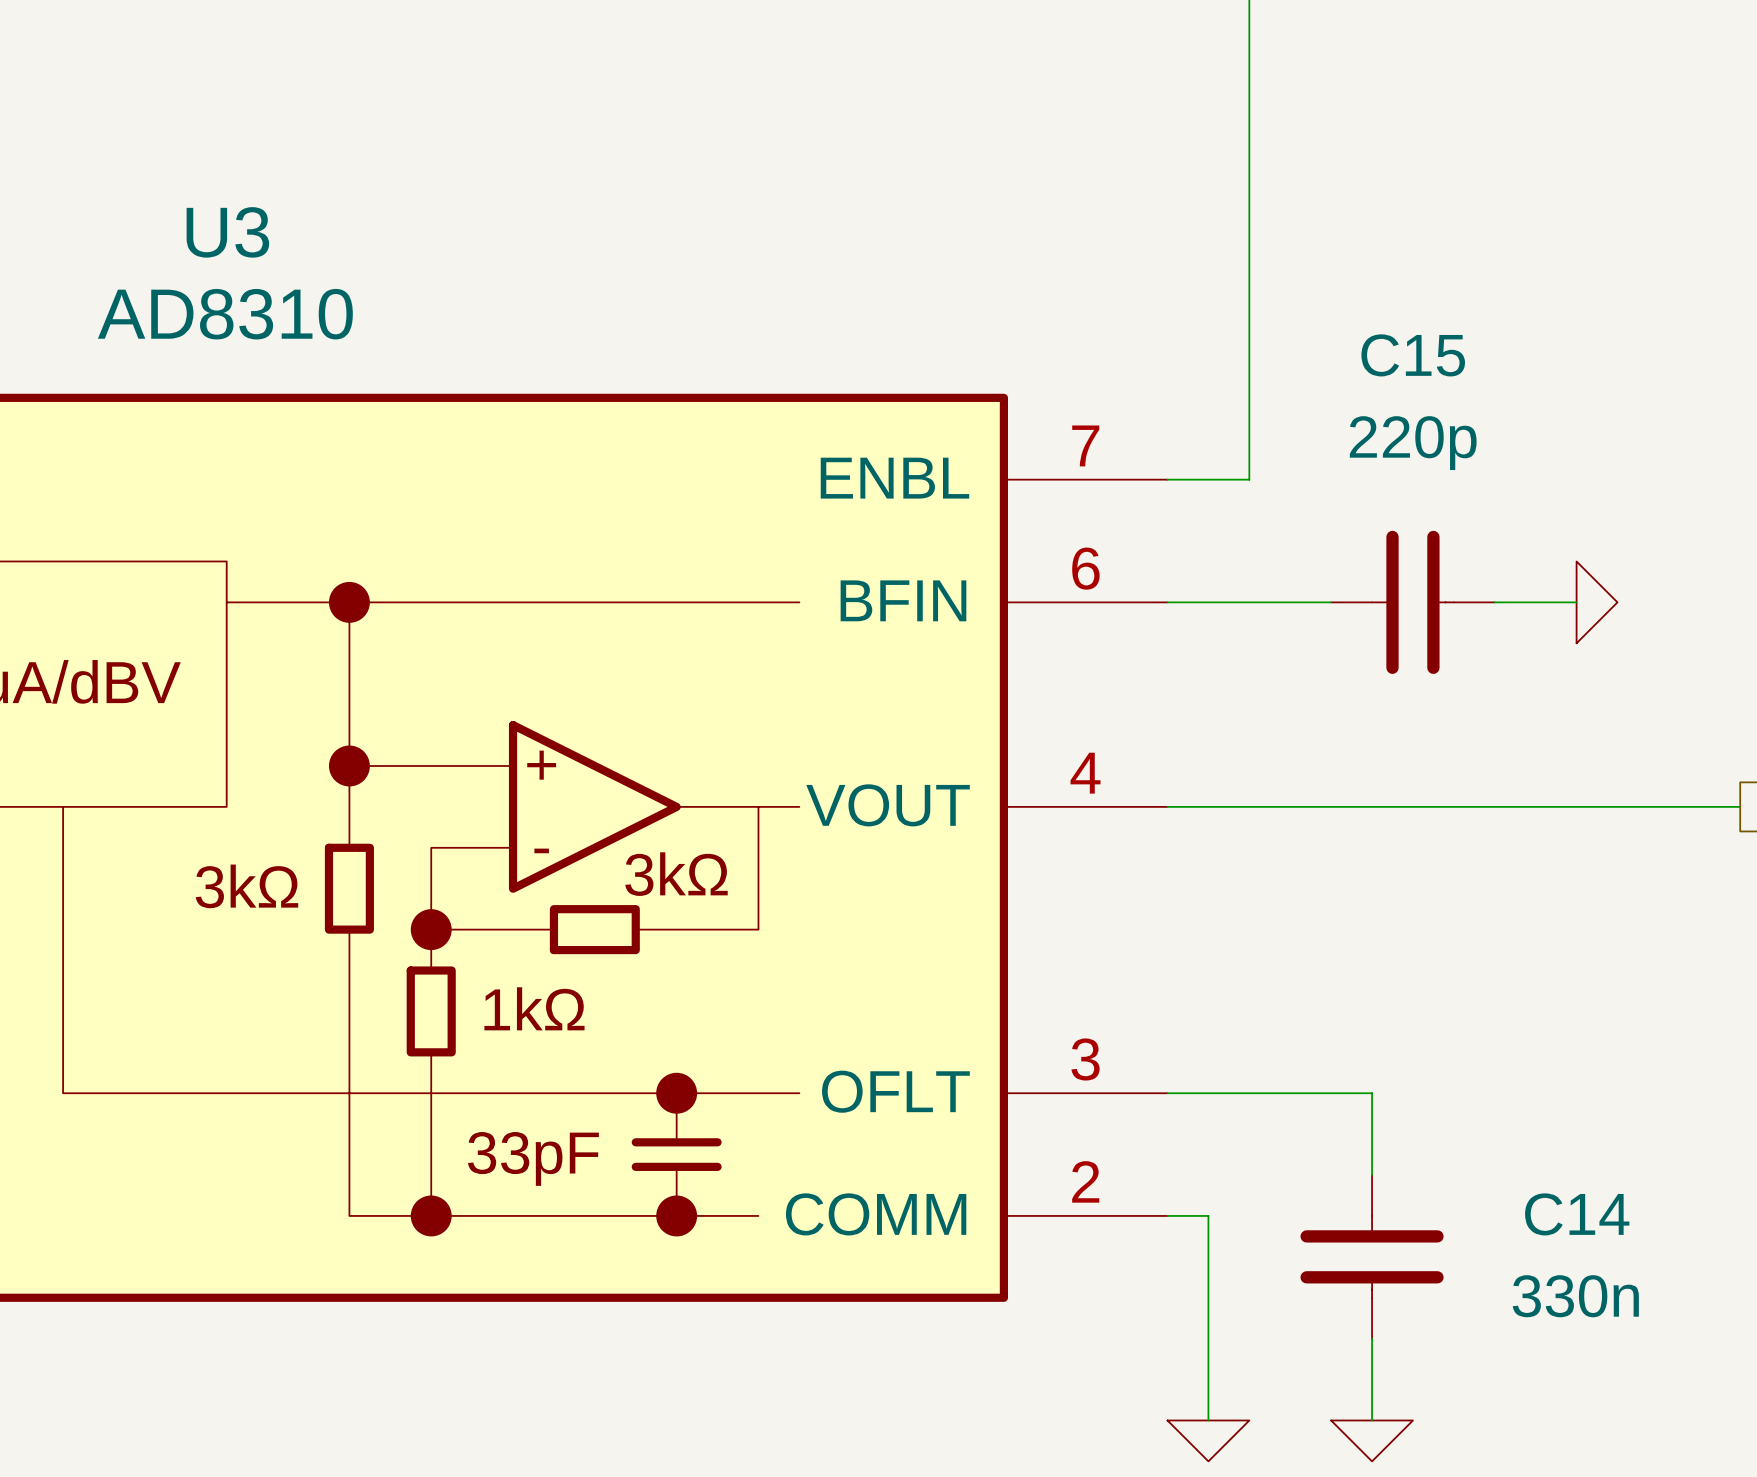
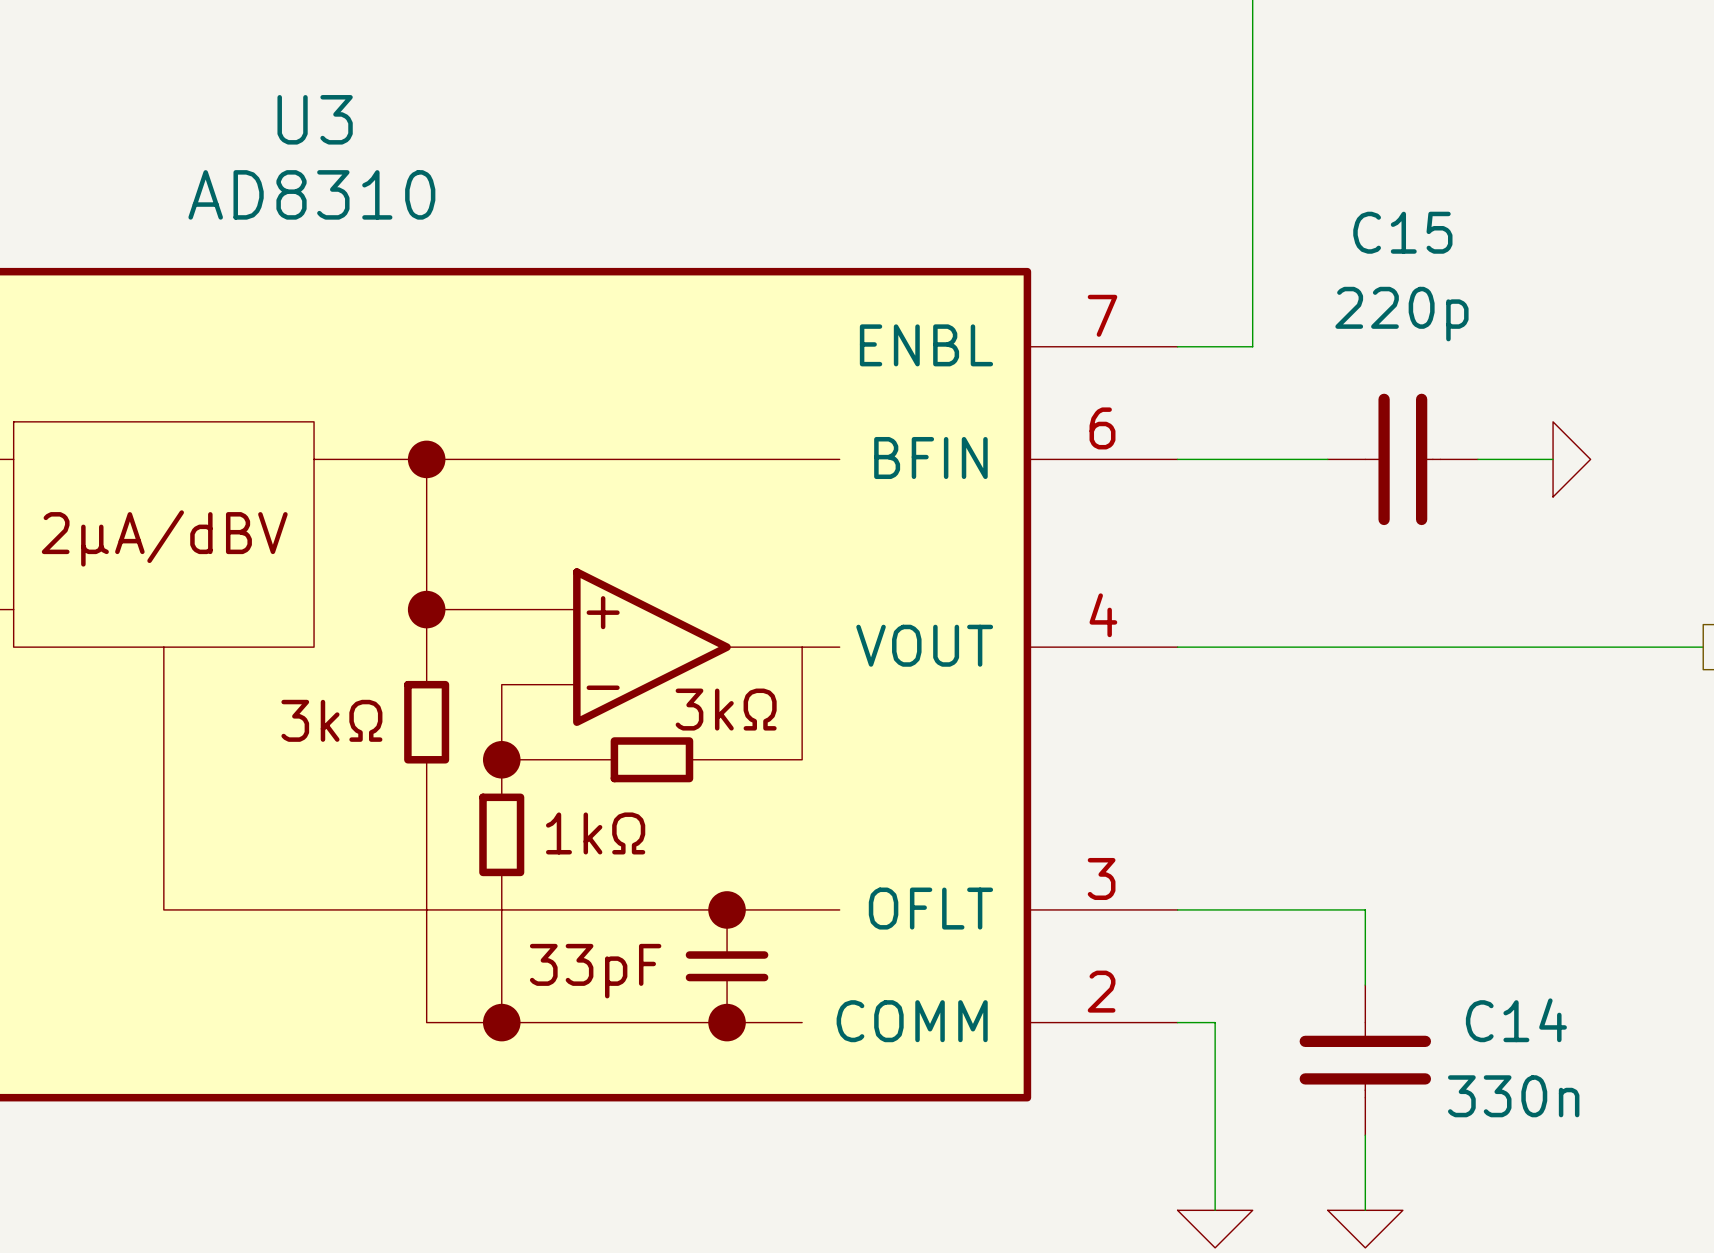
C14 name position: C14 (1577, 1214) -> C14 (1516, 1020)
C14 value position: 330n (1575, 1296) -> 330n (1513, 1096)

